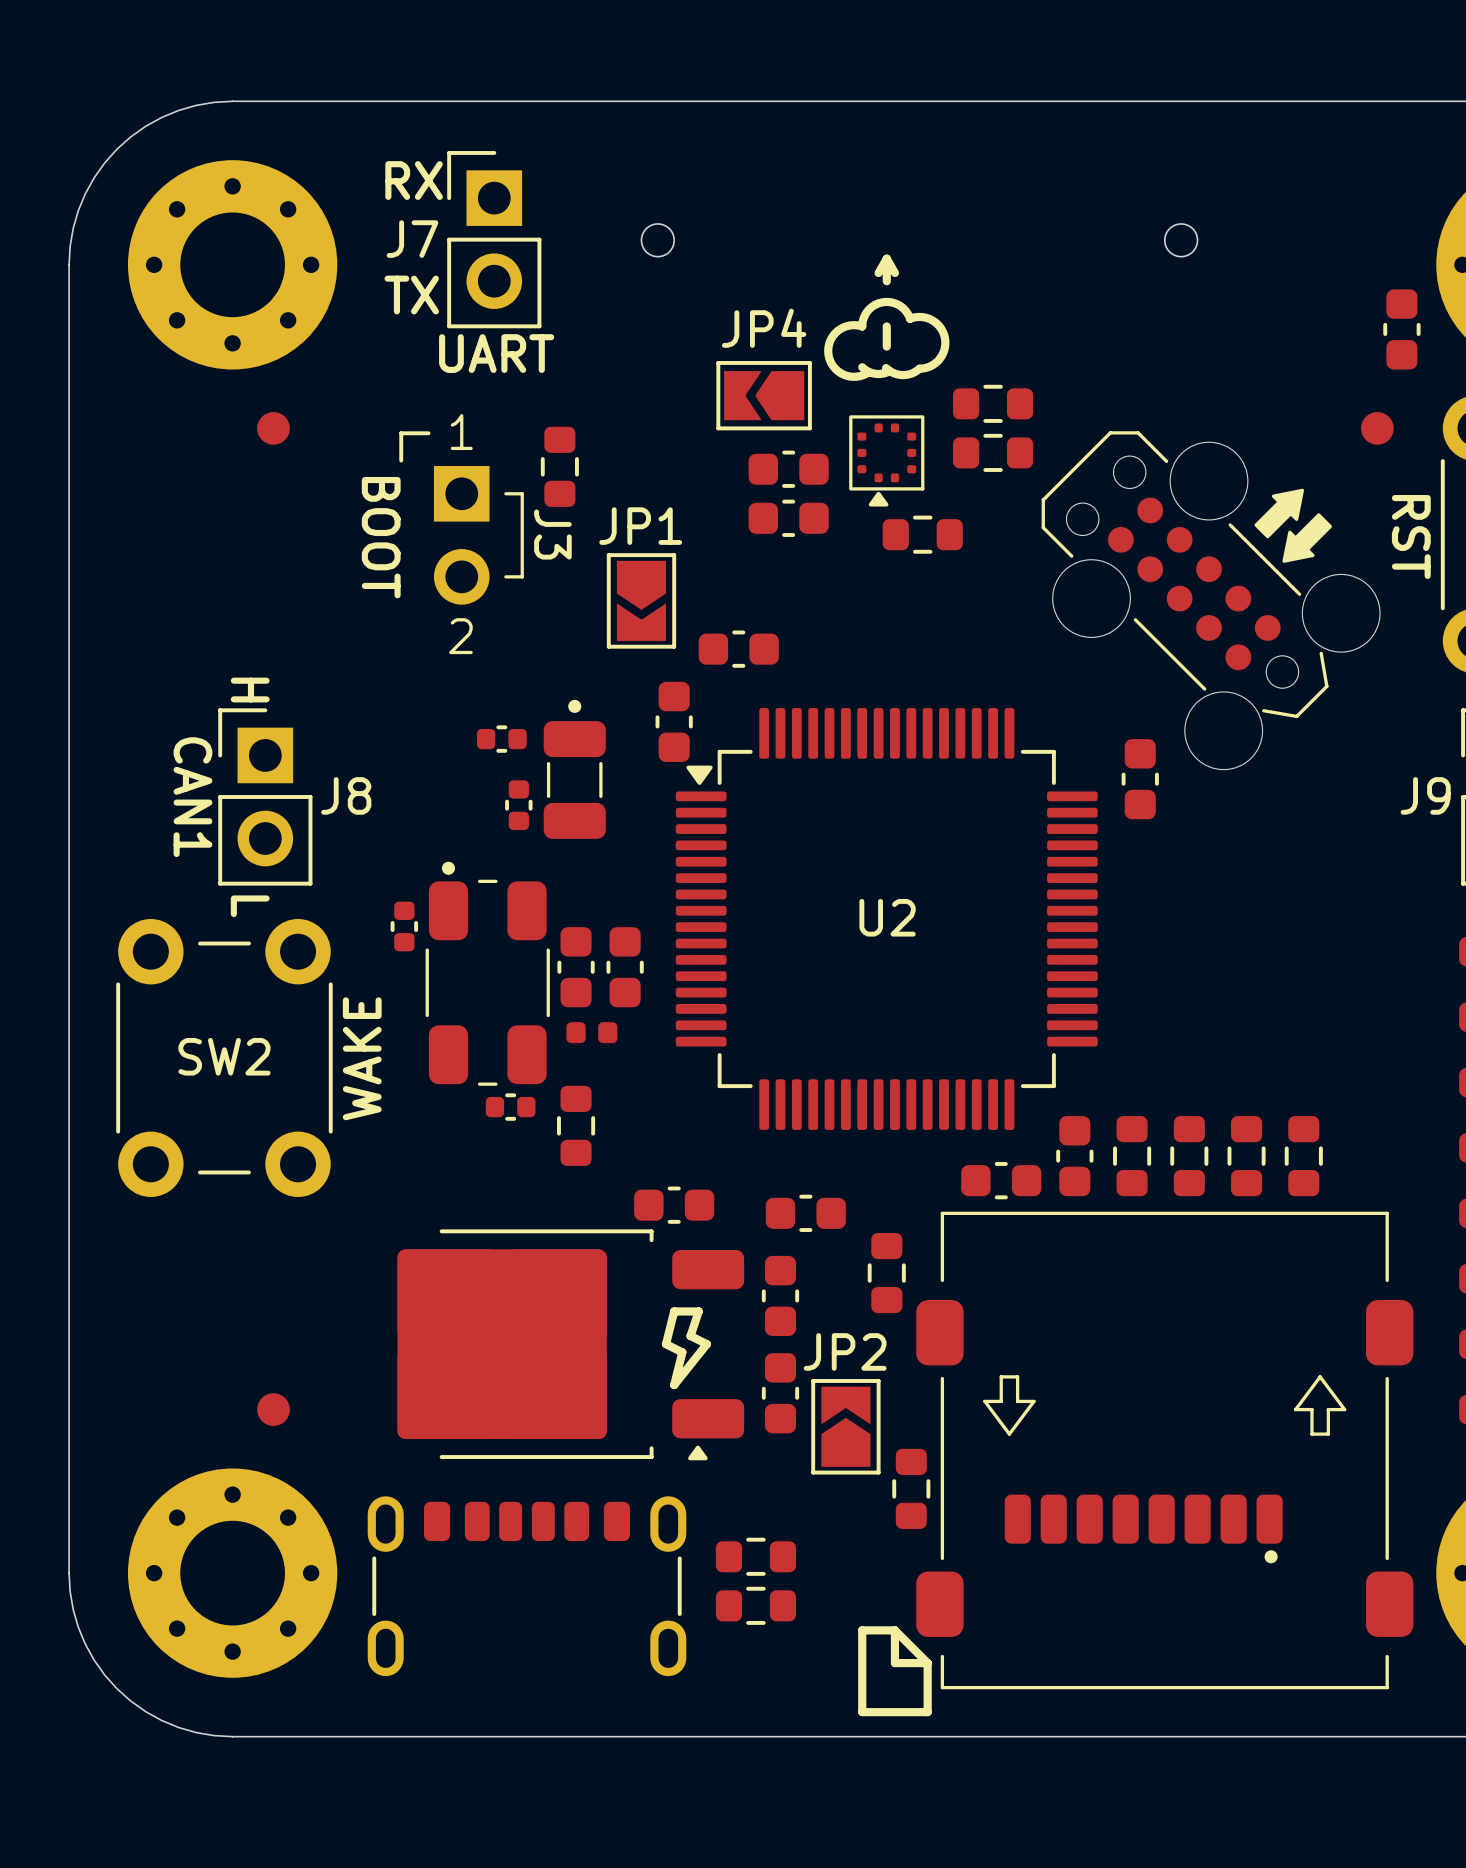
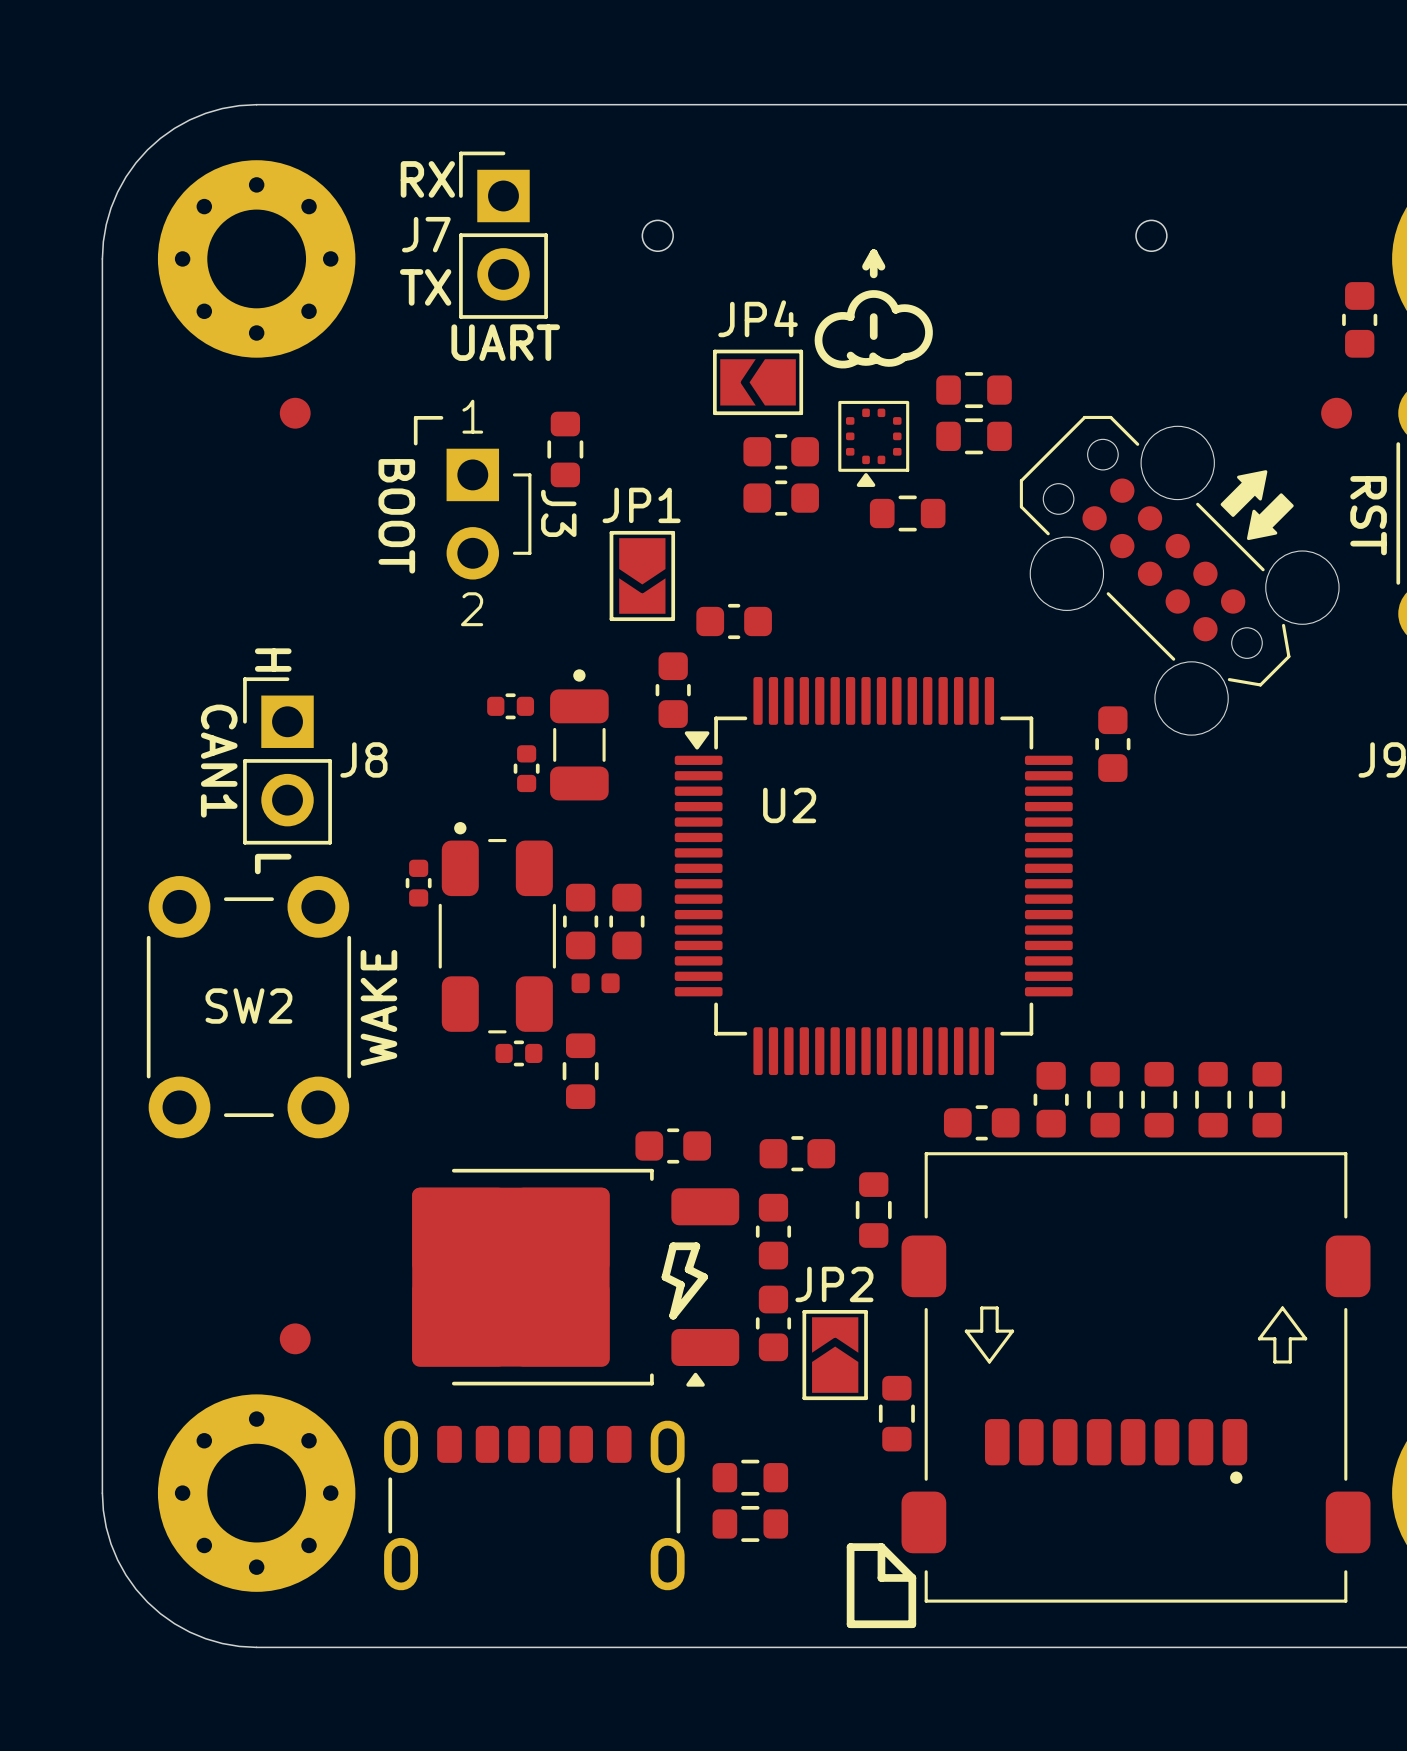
U2 name position: U2 (887, 917) -> U2 (789, 805)

